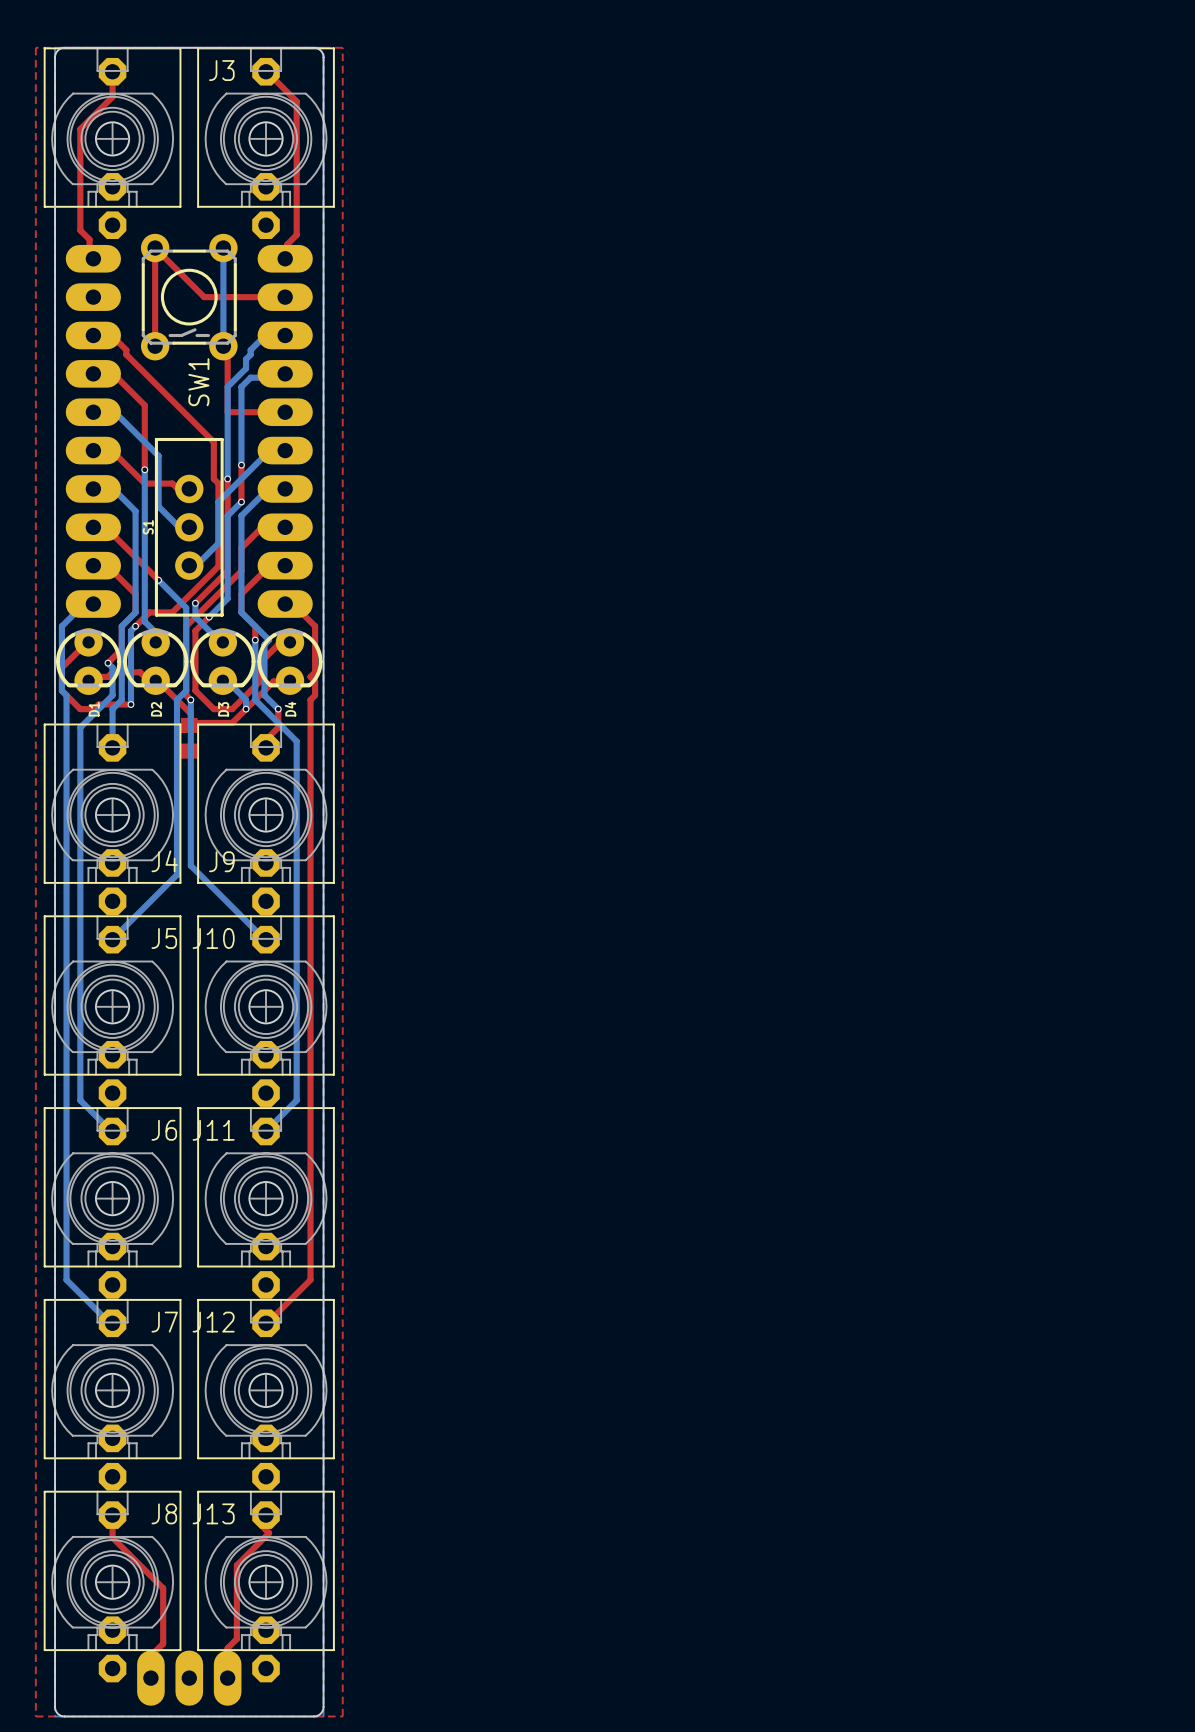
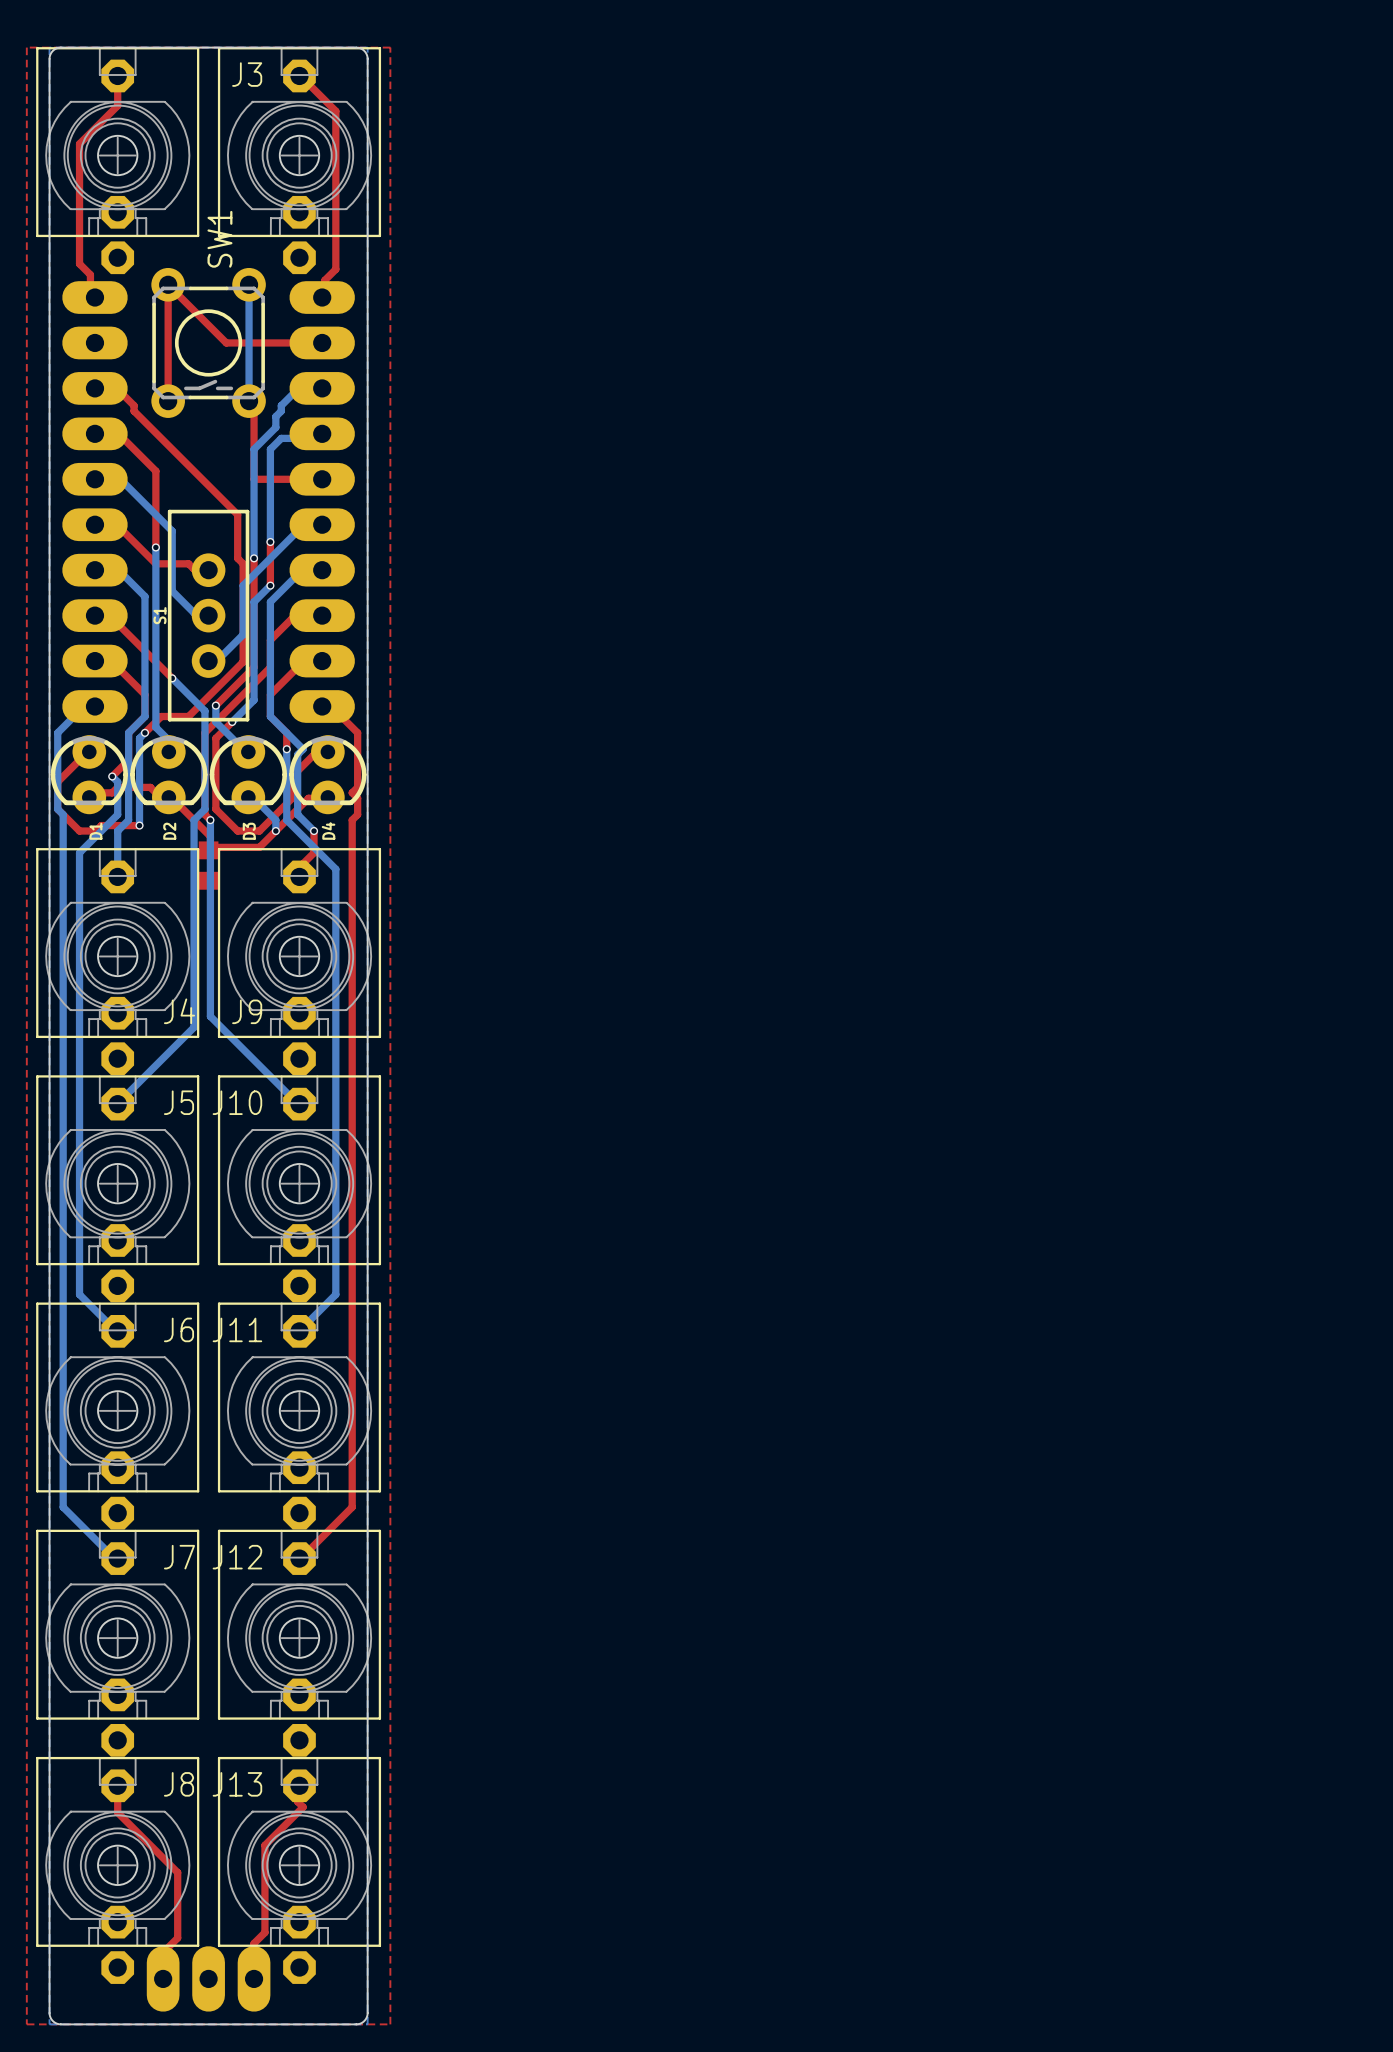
SW1 name position: SW1 (198, 382) -> SW1 (219, 239)

